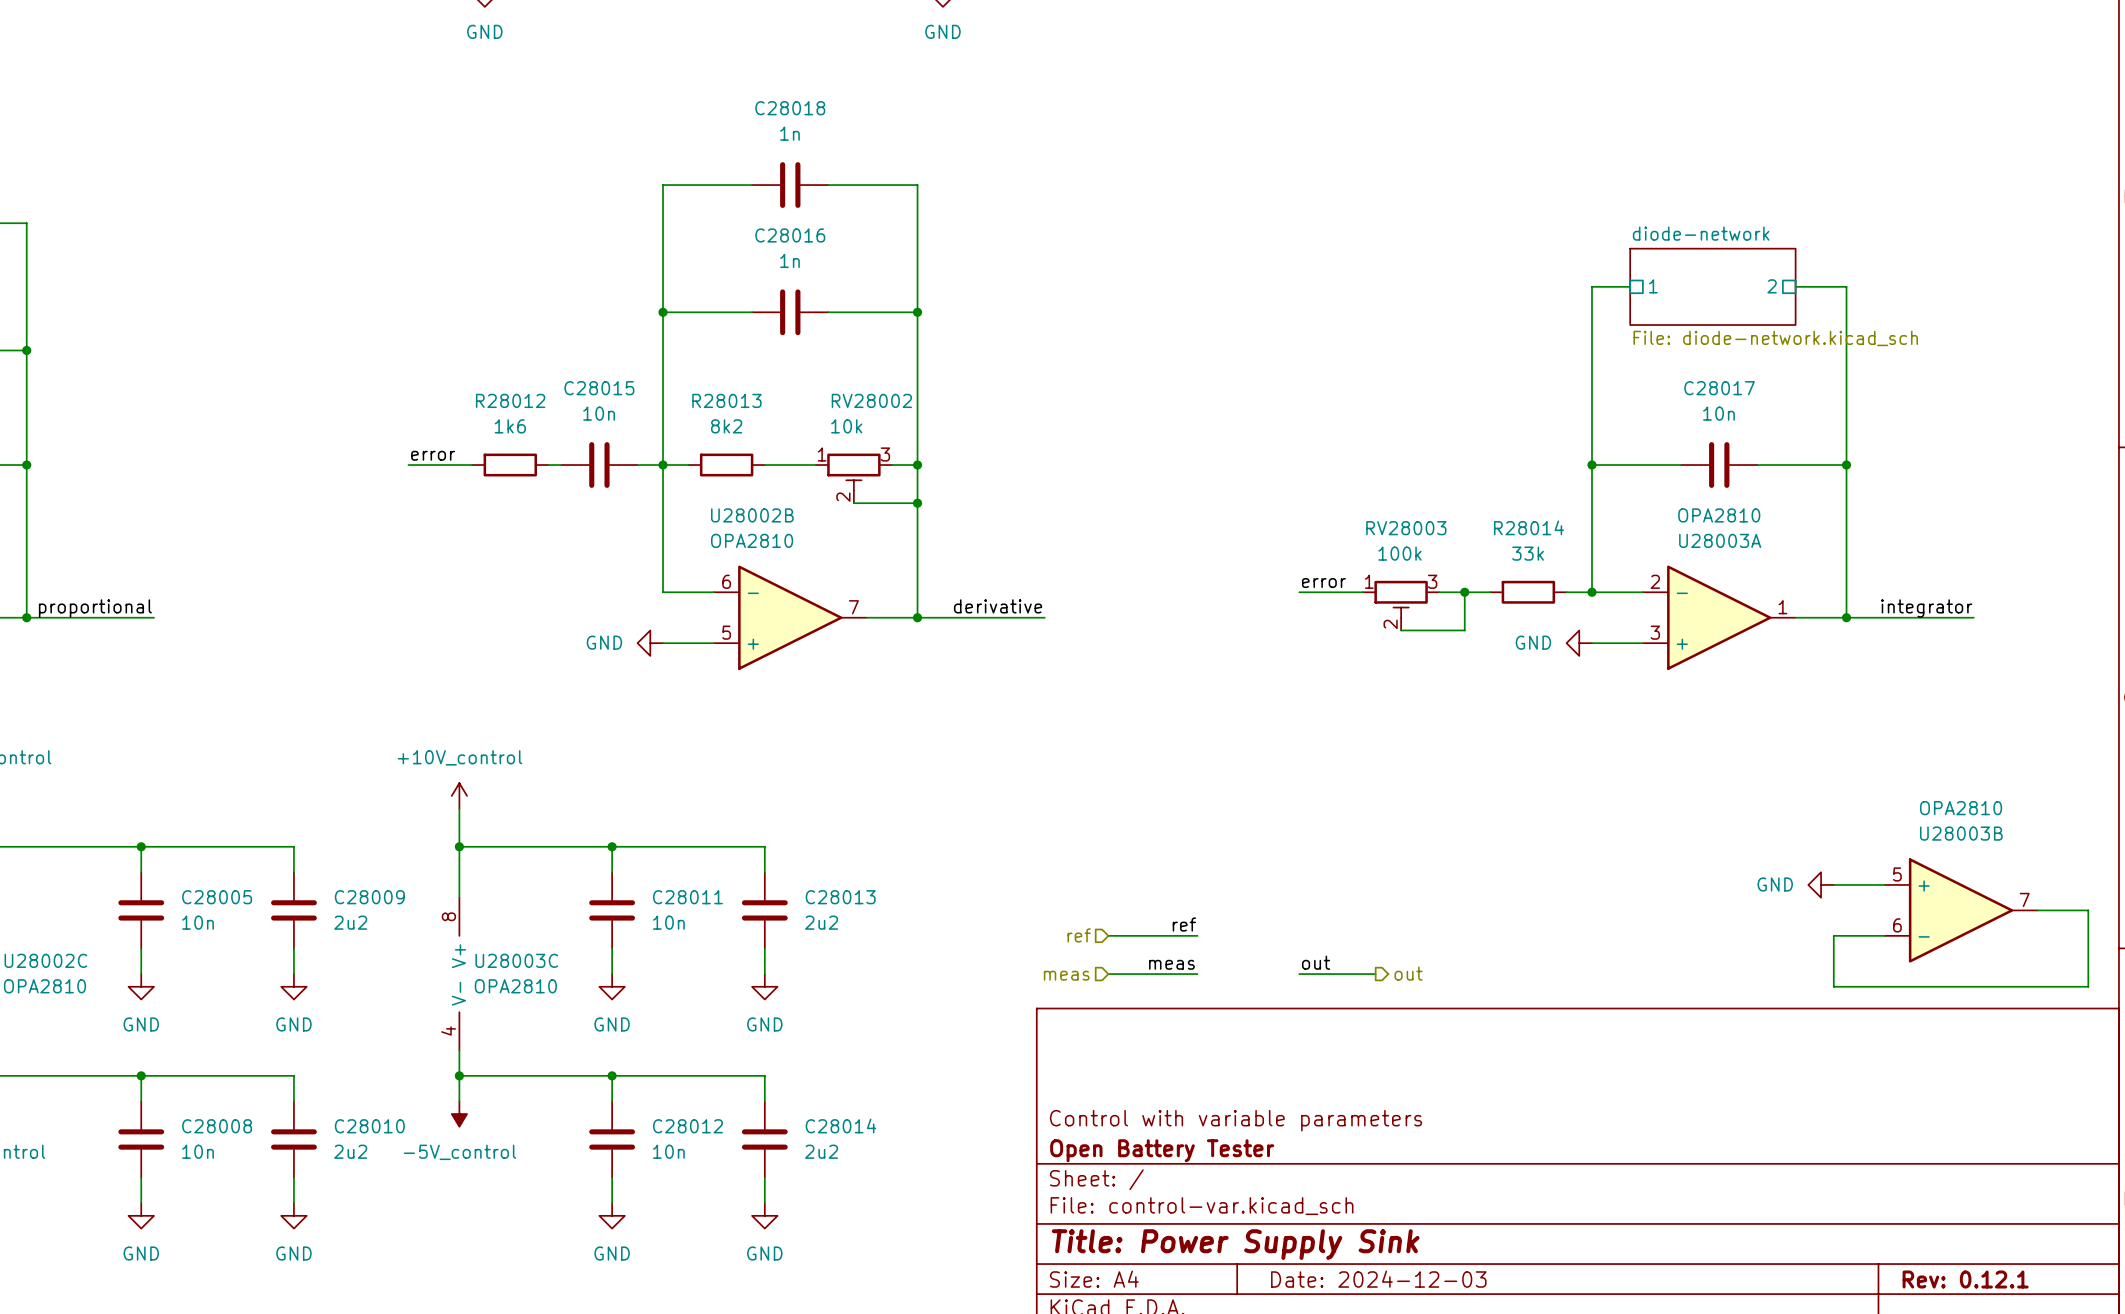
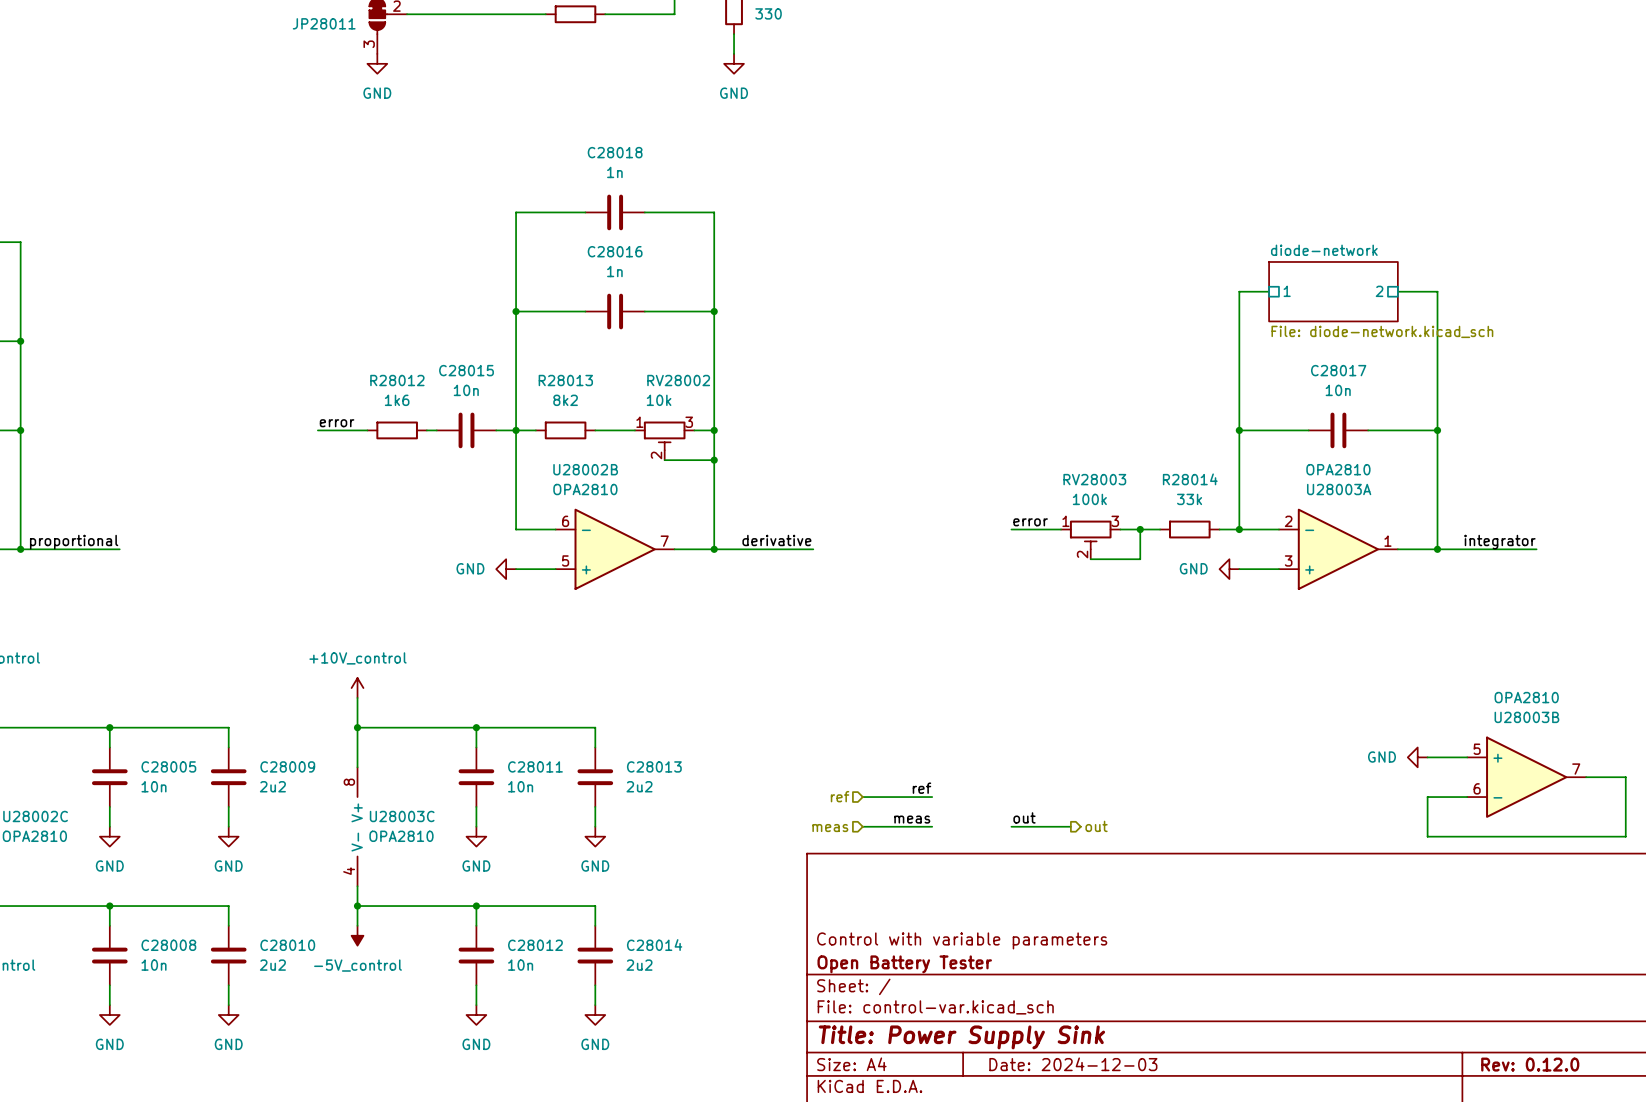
title block: Rev: 0.12.1 (1965, 1279) -> Rev: 0.12.0 (1530, 1064)

